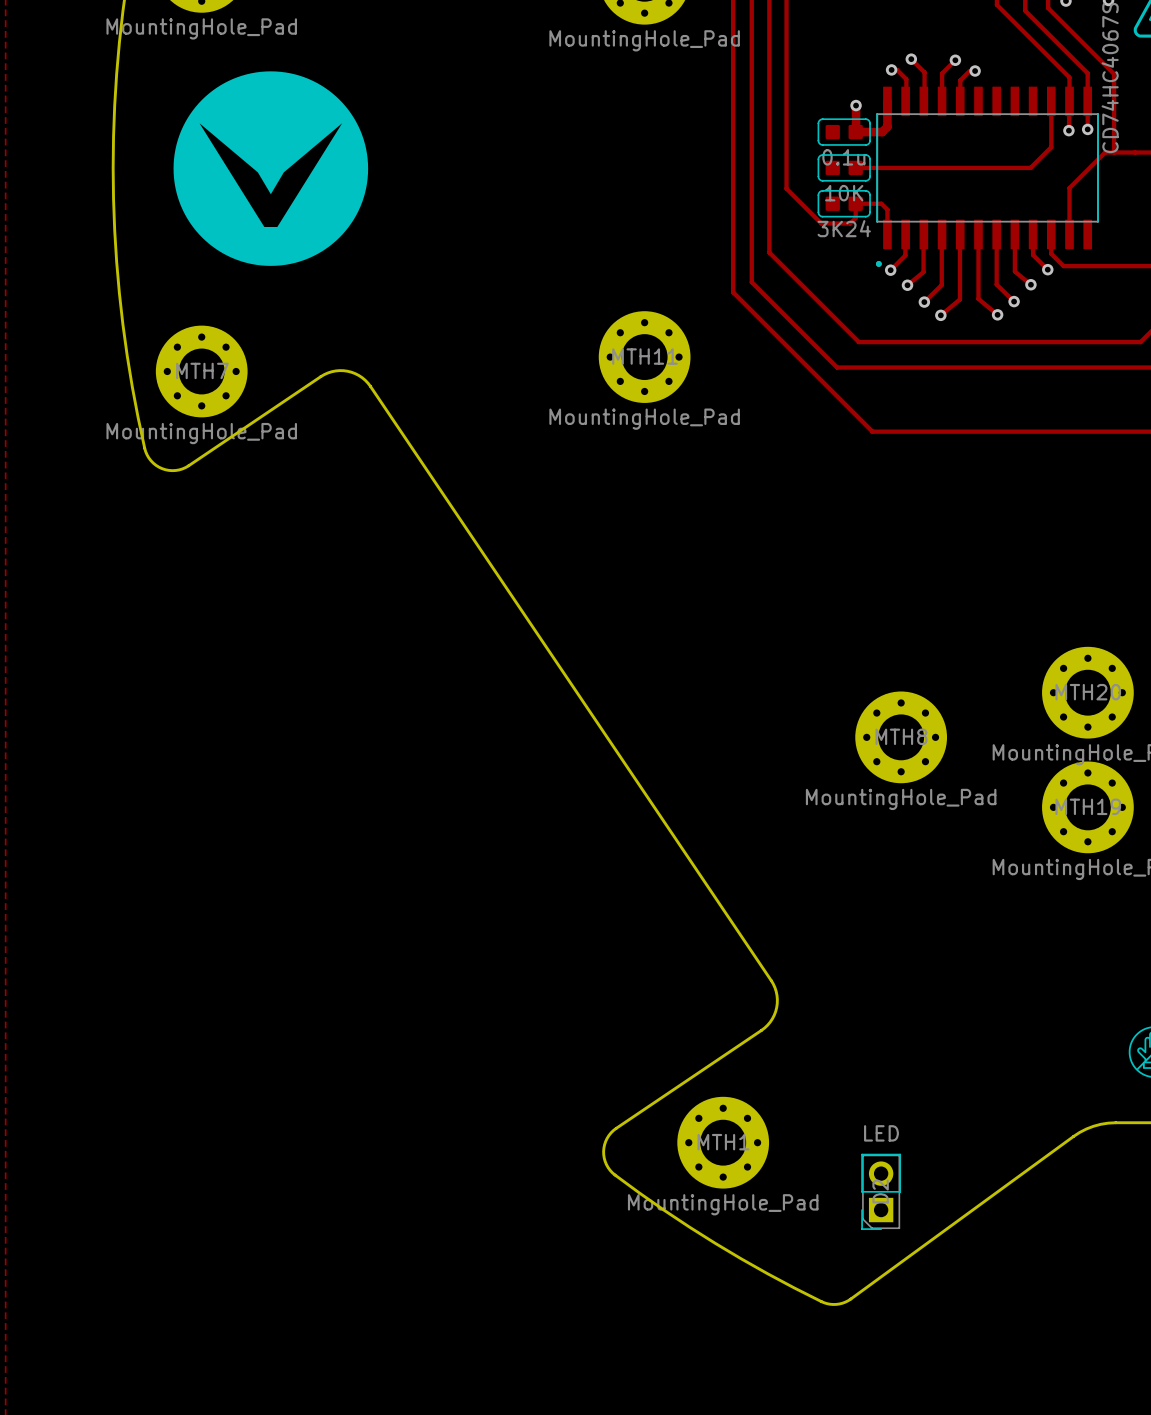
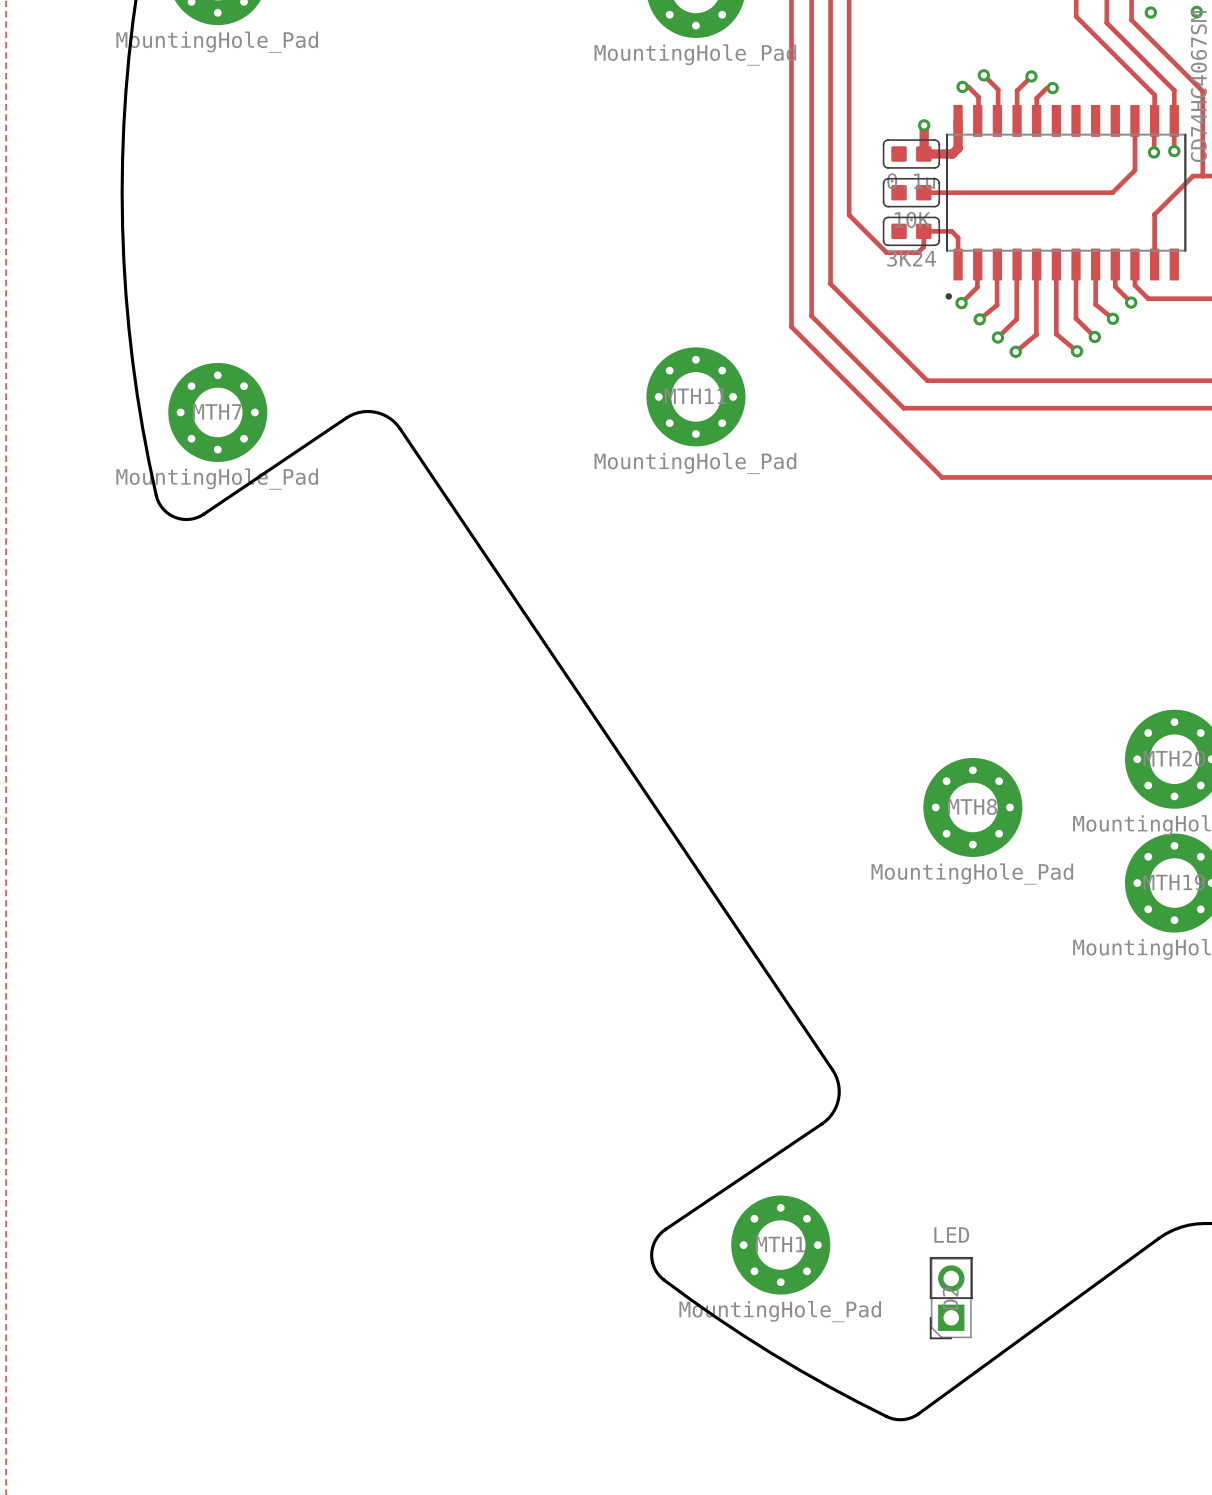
drawing: [173, 71, 369, 266] -> none

